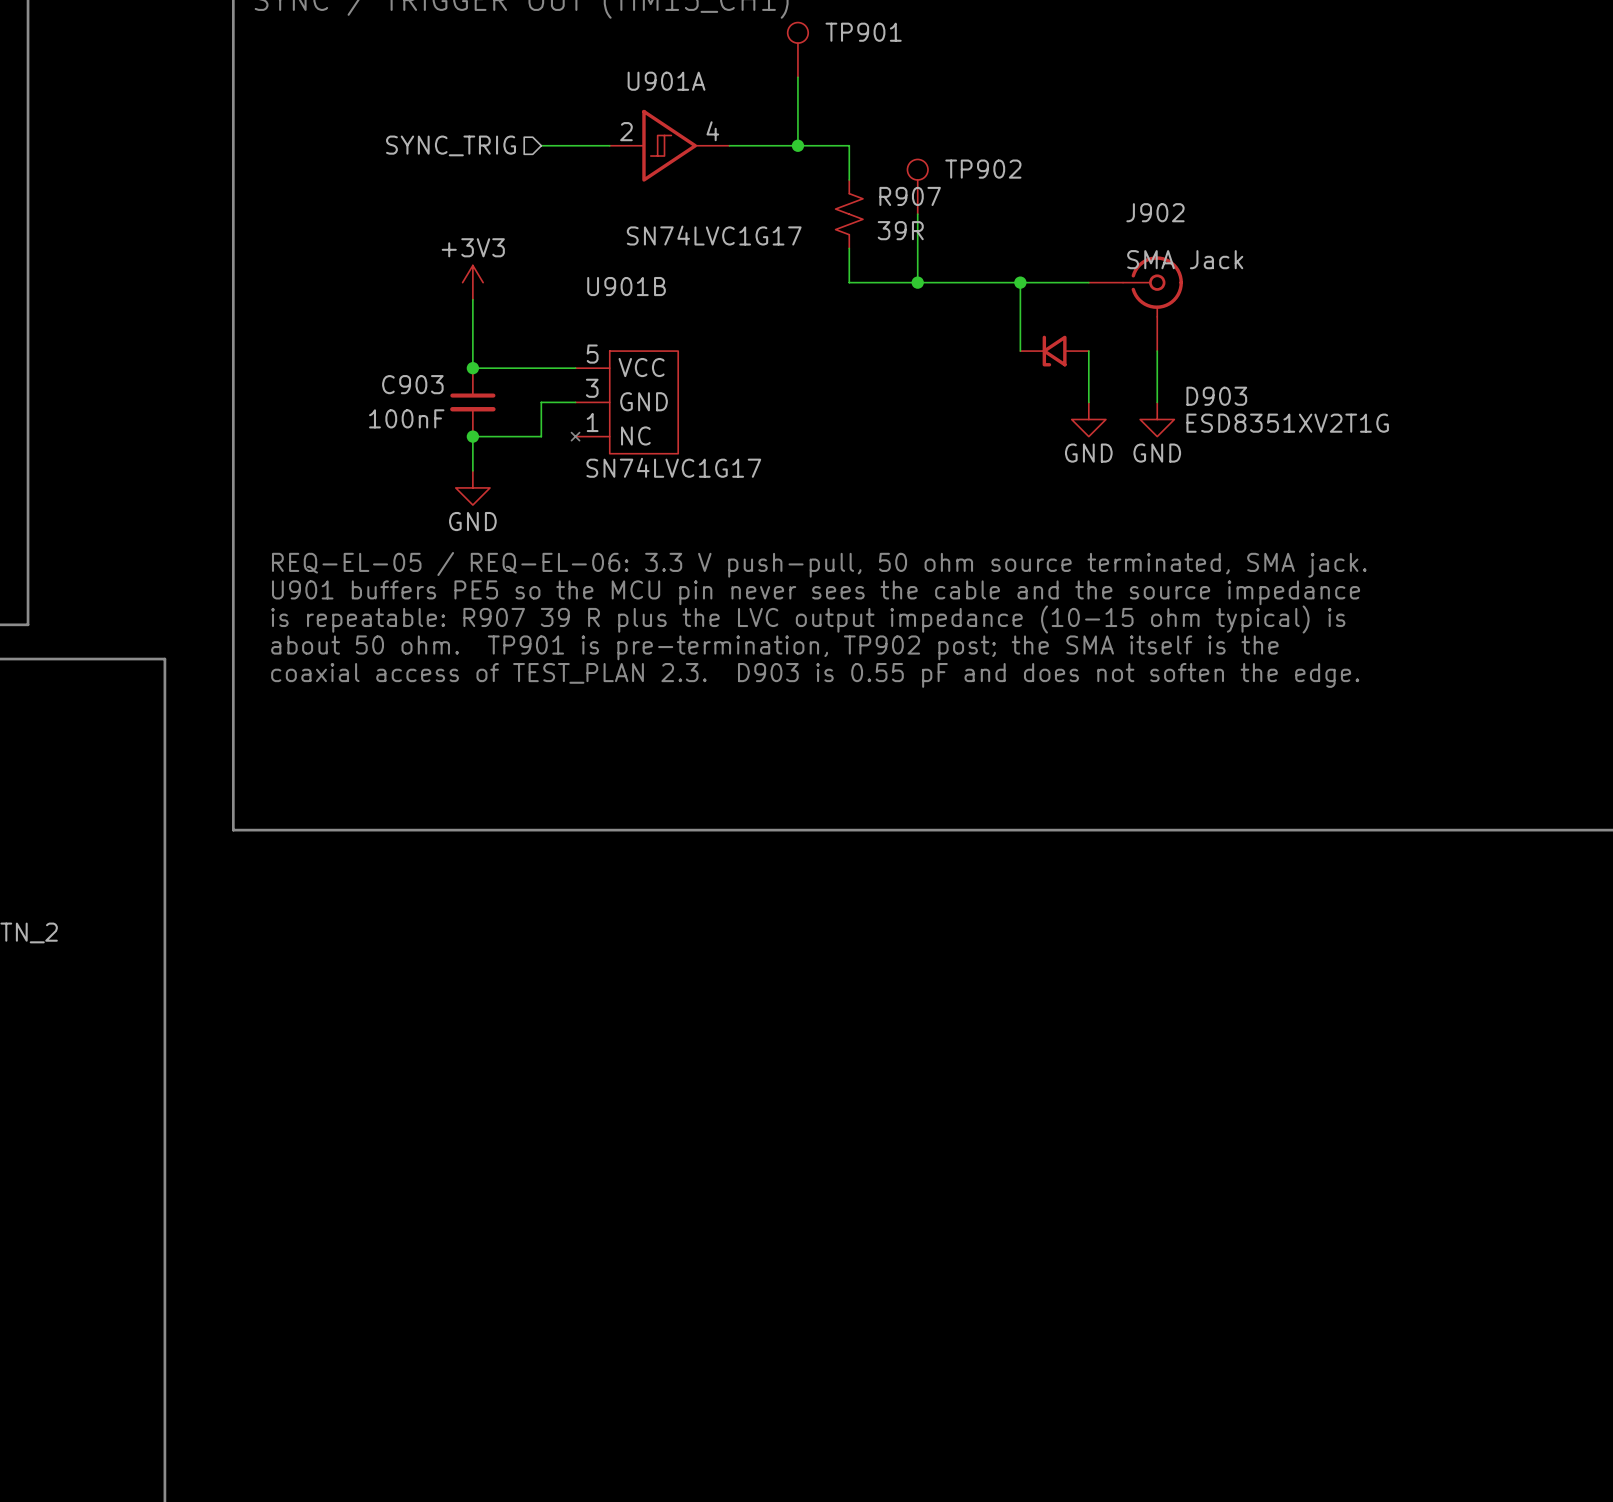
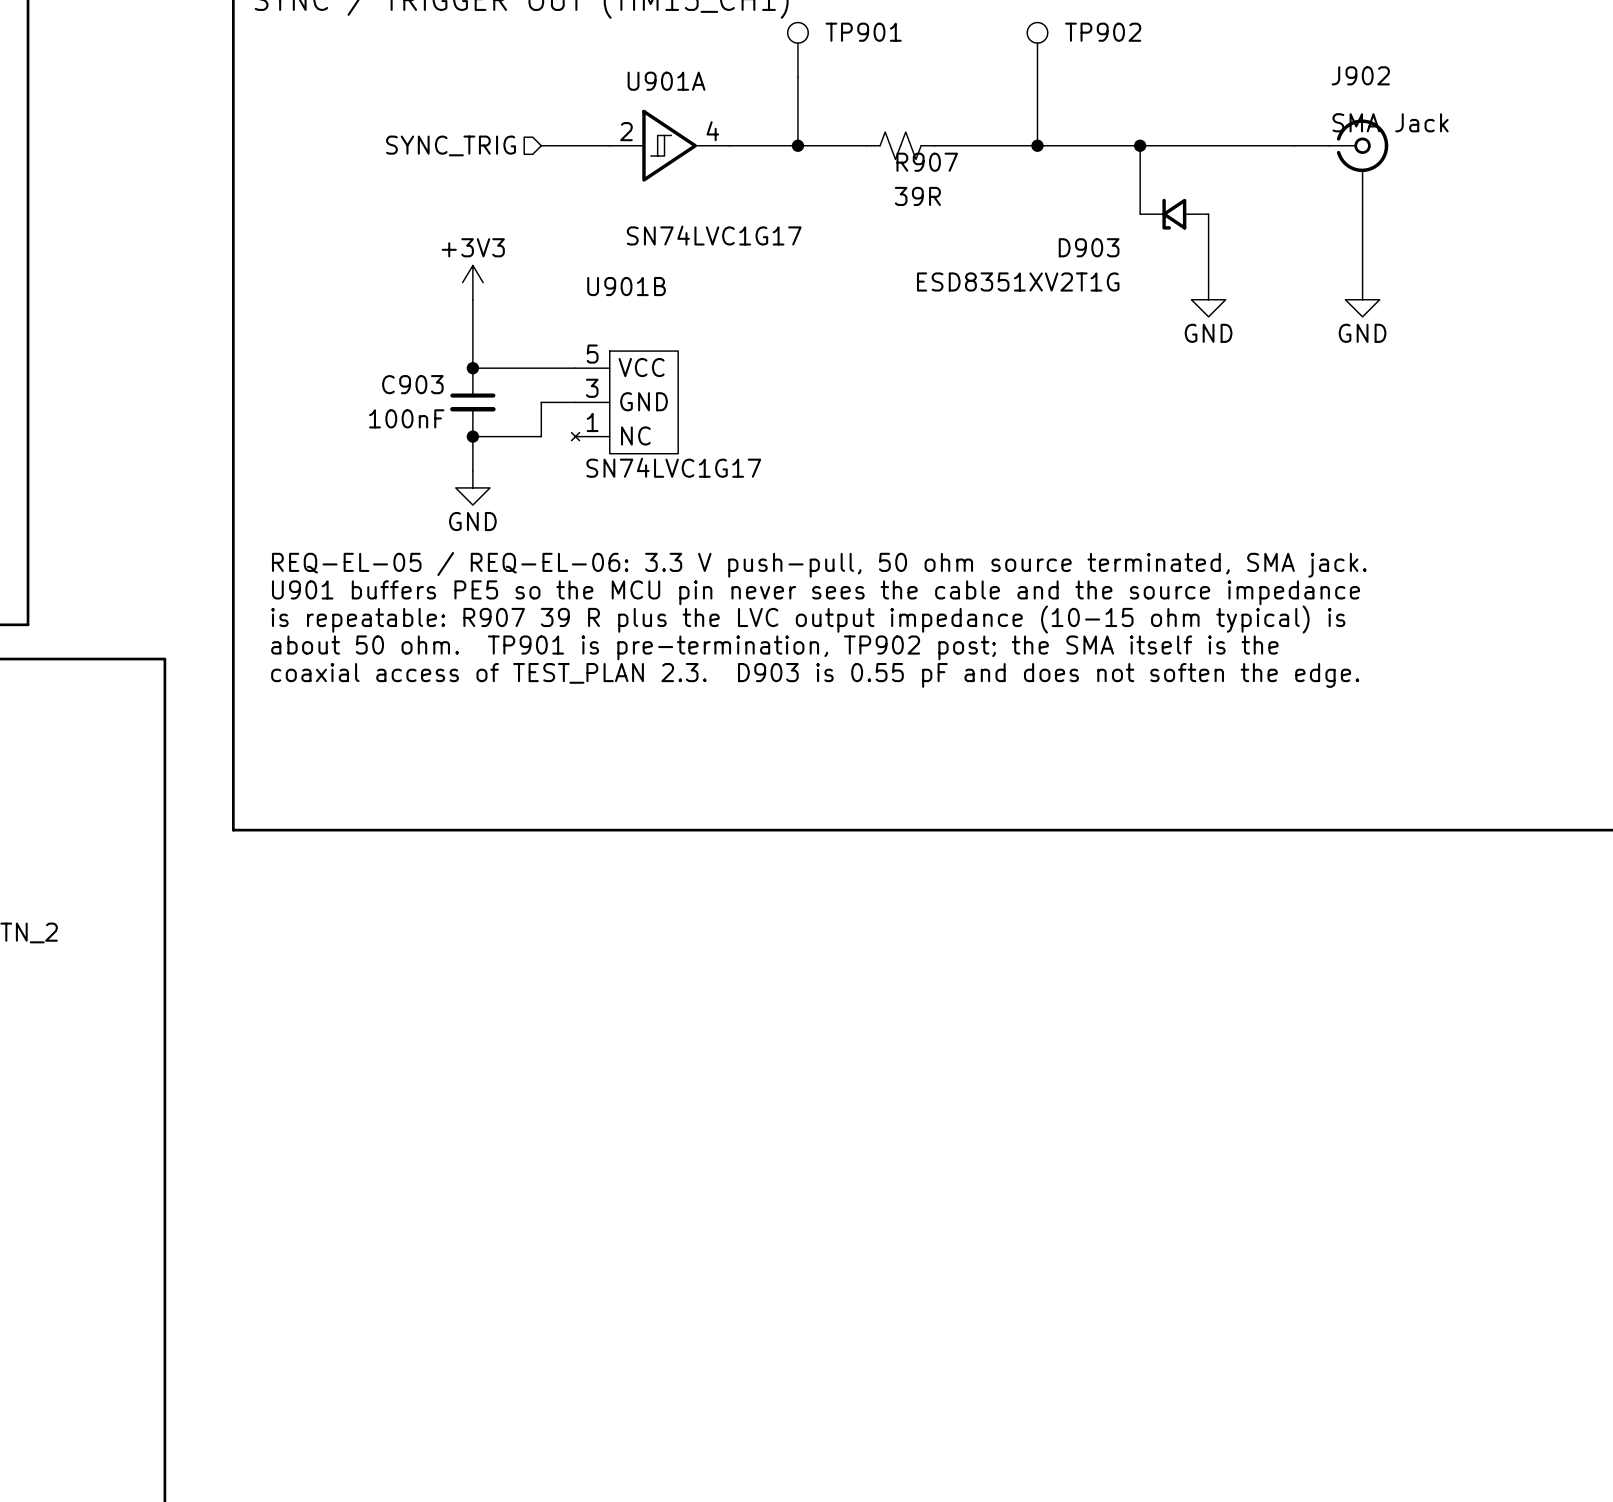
wire: (849, 145) (849, 179) -> (849, 145) (866, 145)
wire: none -> (934, 145) (1294, 145)
junction: none -> (1037, 145)
junction: none -> (1140, 145)
TP902 position: (917, 186) -> (1037, 49)
R907 name position: R907 (910, 196) -> R907 (927, 162)
R907 rotation: 0° (849, 214) -> 90° clockwise (900, 145)
R907 position: (849, 214) -> (900, 145)
wire: (917, 214) (917, 282) -> (1037, 77) (1037, 145)
wire: none -> (1208, 214) (1208, 282)
wire: none -> (1362, 214) (1362, 282)
R907 value position: 39R (900, 230) -> 39R (917, 196)
wire: (849, 248) (849, 282) (1088, 282) -> none
junction: (917, 282) -> none
wire: (1020, 282) (1020, 351) -> (1140, 145) (1140, 214)
junction: (1020, 282) -> none
power symbol: none -> GND (1208, 299)
power symbol: none -> GND (1362, 299)
J902 position: (1135, 303) -> (1341, 166)
D903 position: (1054, 351) -> (1174, 214)
wire: (1088, 351) (1088, 402) -> none
wire: (1157, 351) (1157, 402) -> none
D903 name position: D903 (1216, 396) -> D903 (1089, 247)
power symbol: GND (1088, 419) -> none
power symbol: GND (1157, 419) -> none
D903 value position: ESD8351XV2T1G (1287, 423) -> ESD8351XV2T1G (1018, 281)

